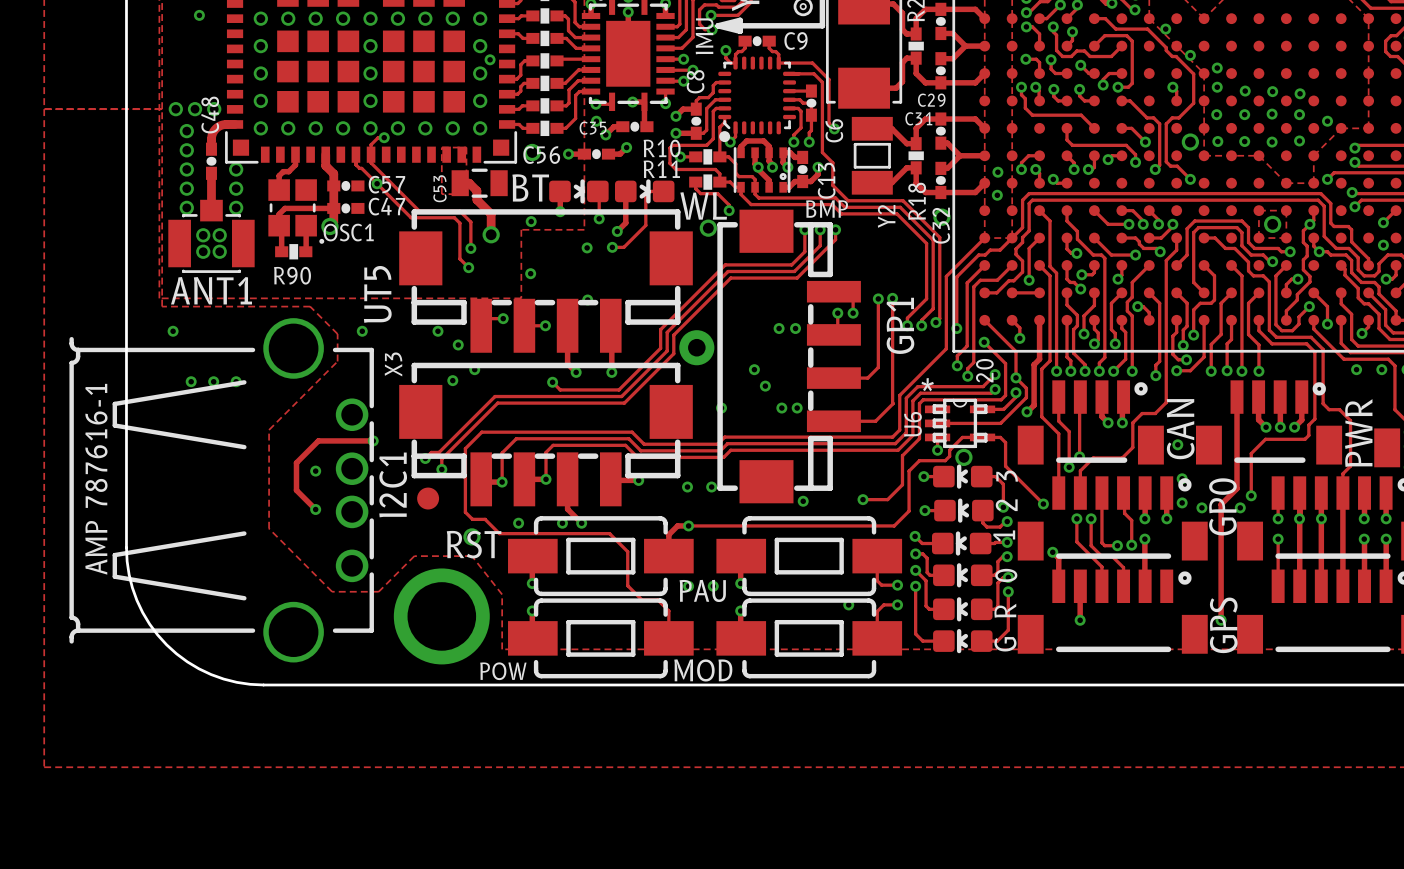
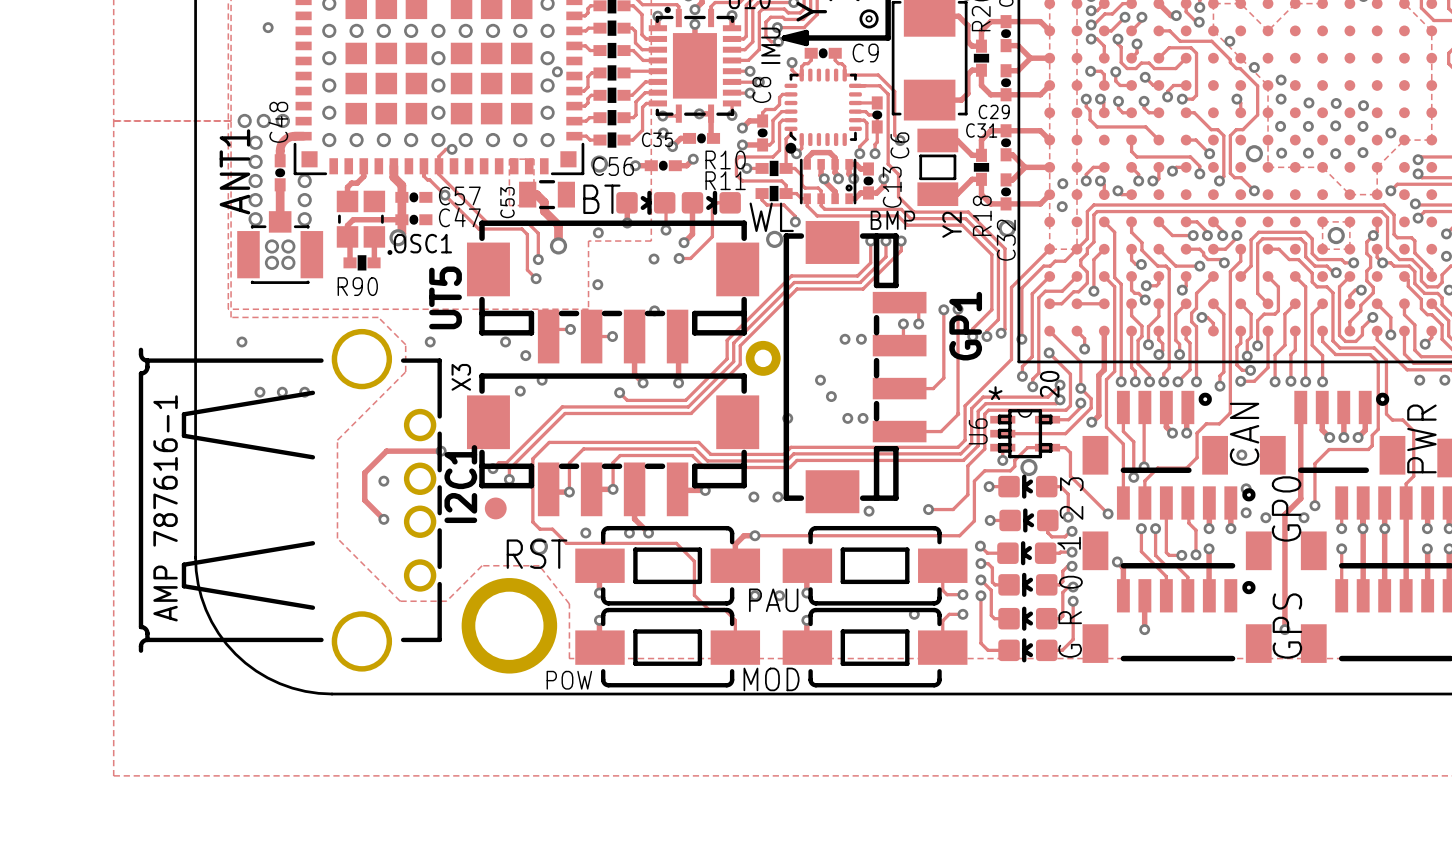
ANT1 name rotation: 0° (211, 290) -> 90° counterclockwise (234, 171)
ANT1 name position: ANT1 (211, 290) -> ANT1 (234, 171)

